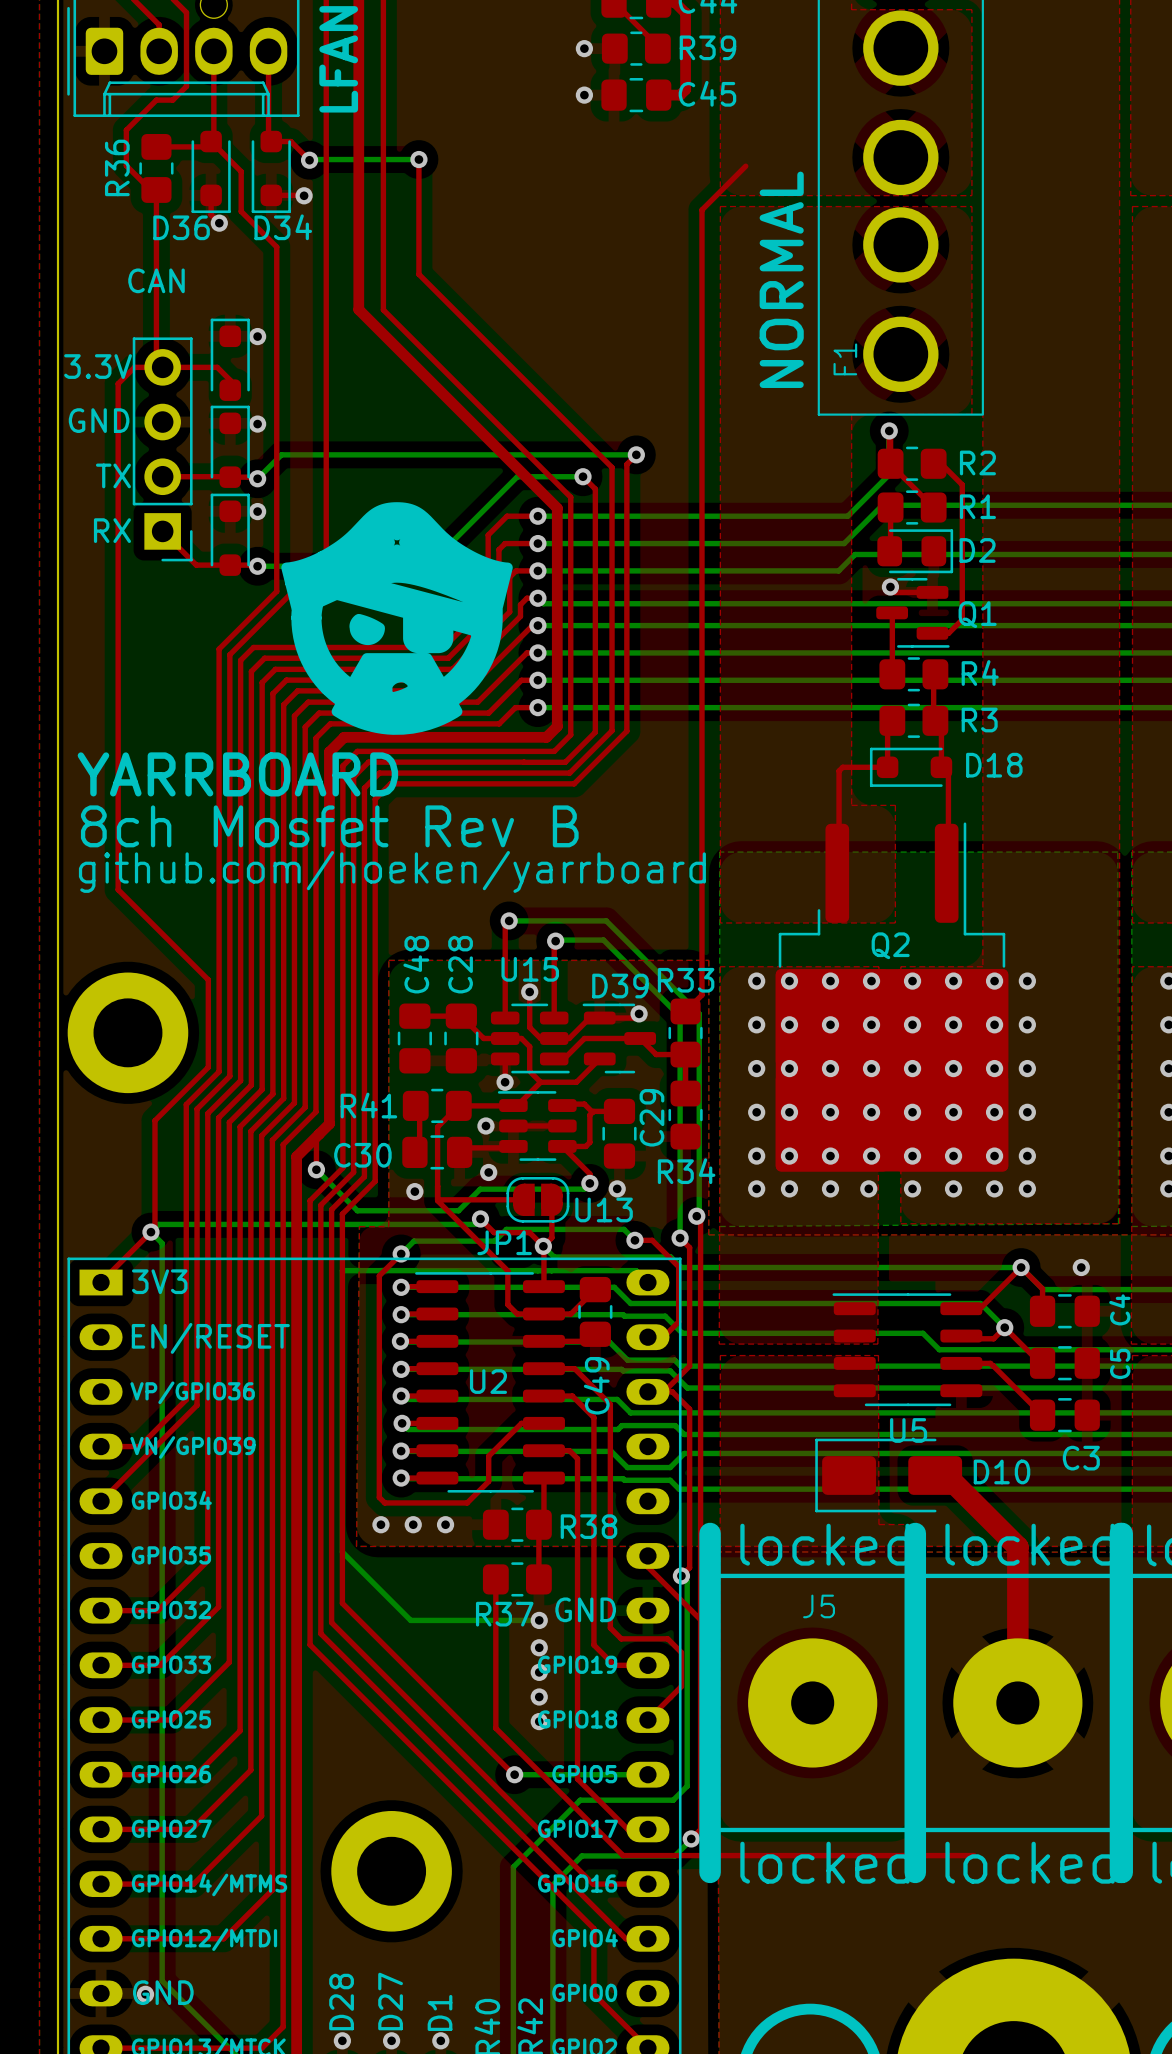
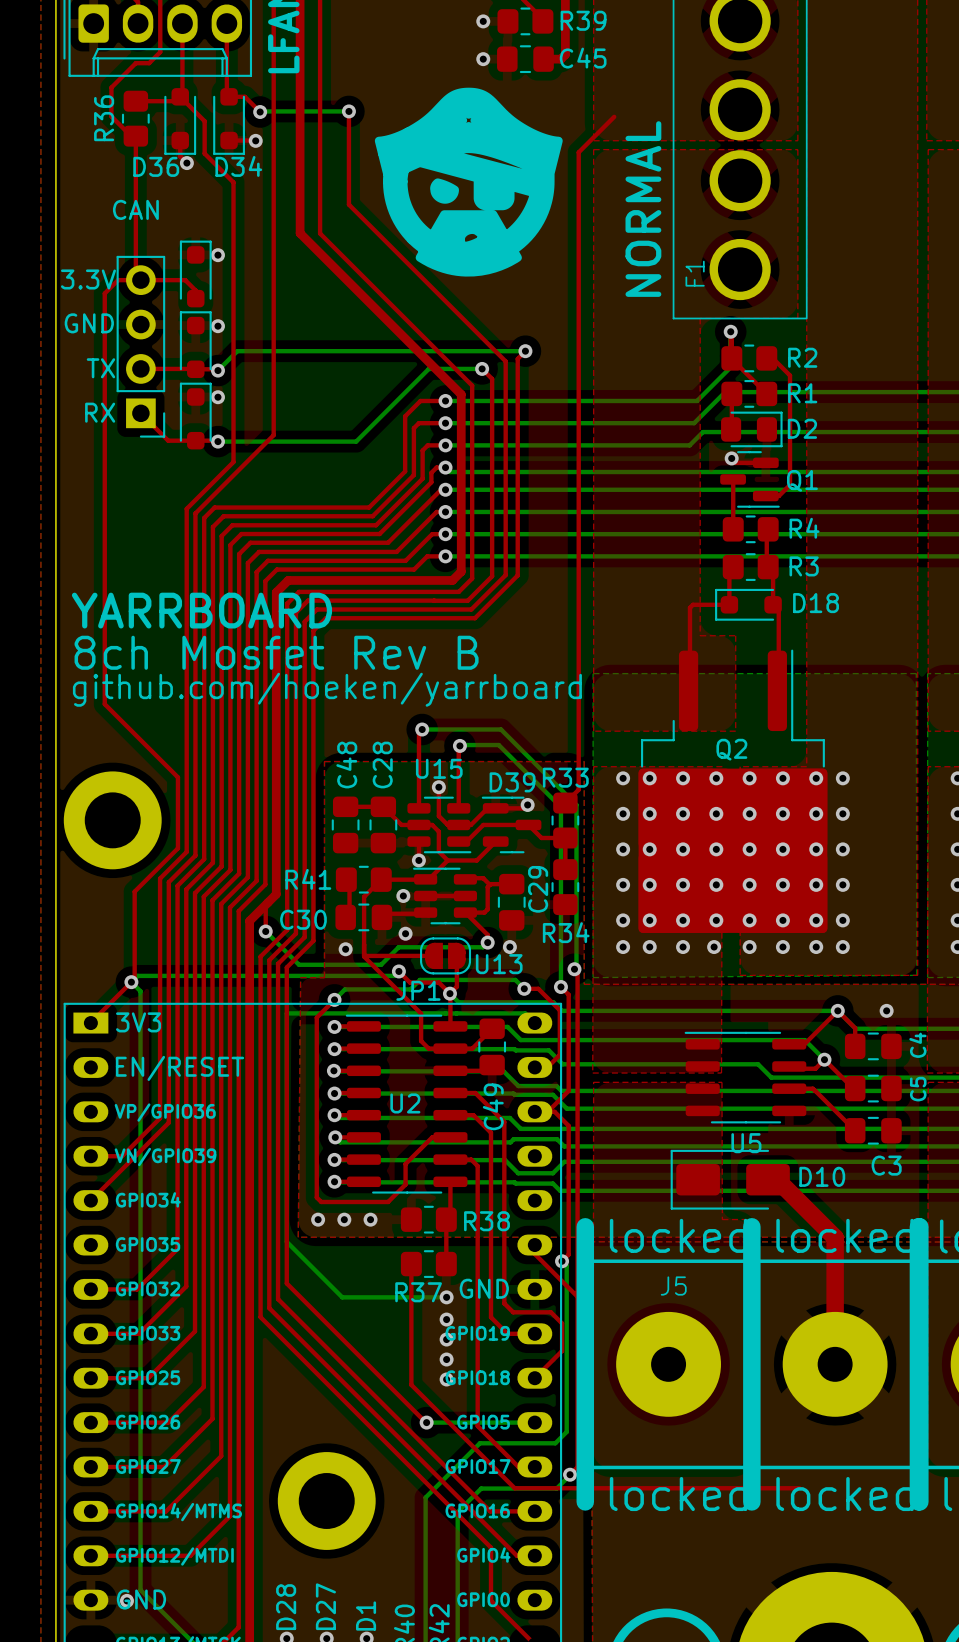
drawing position: (397, 618) -> (468, 182)

